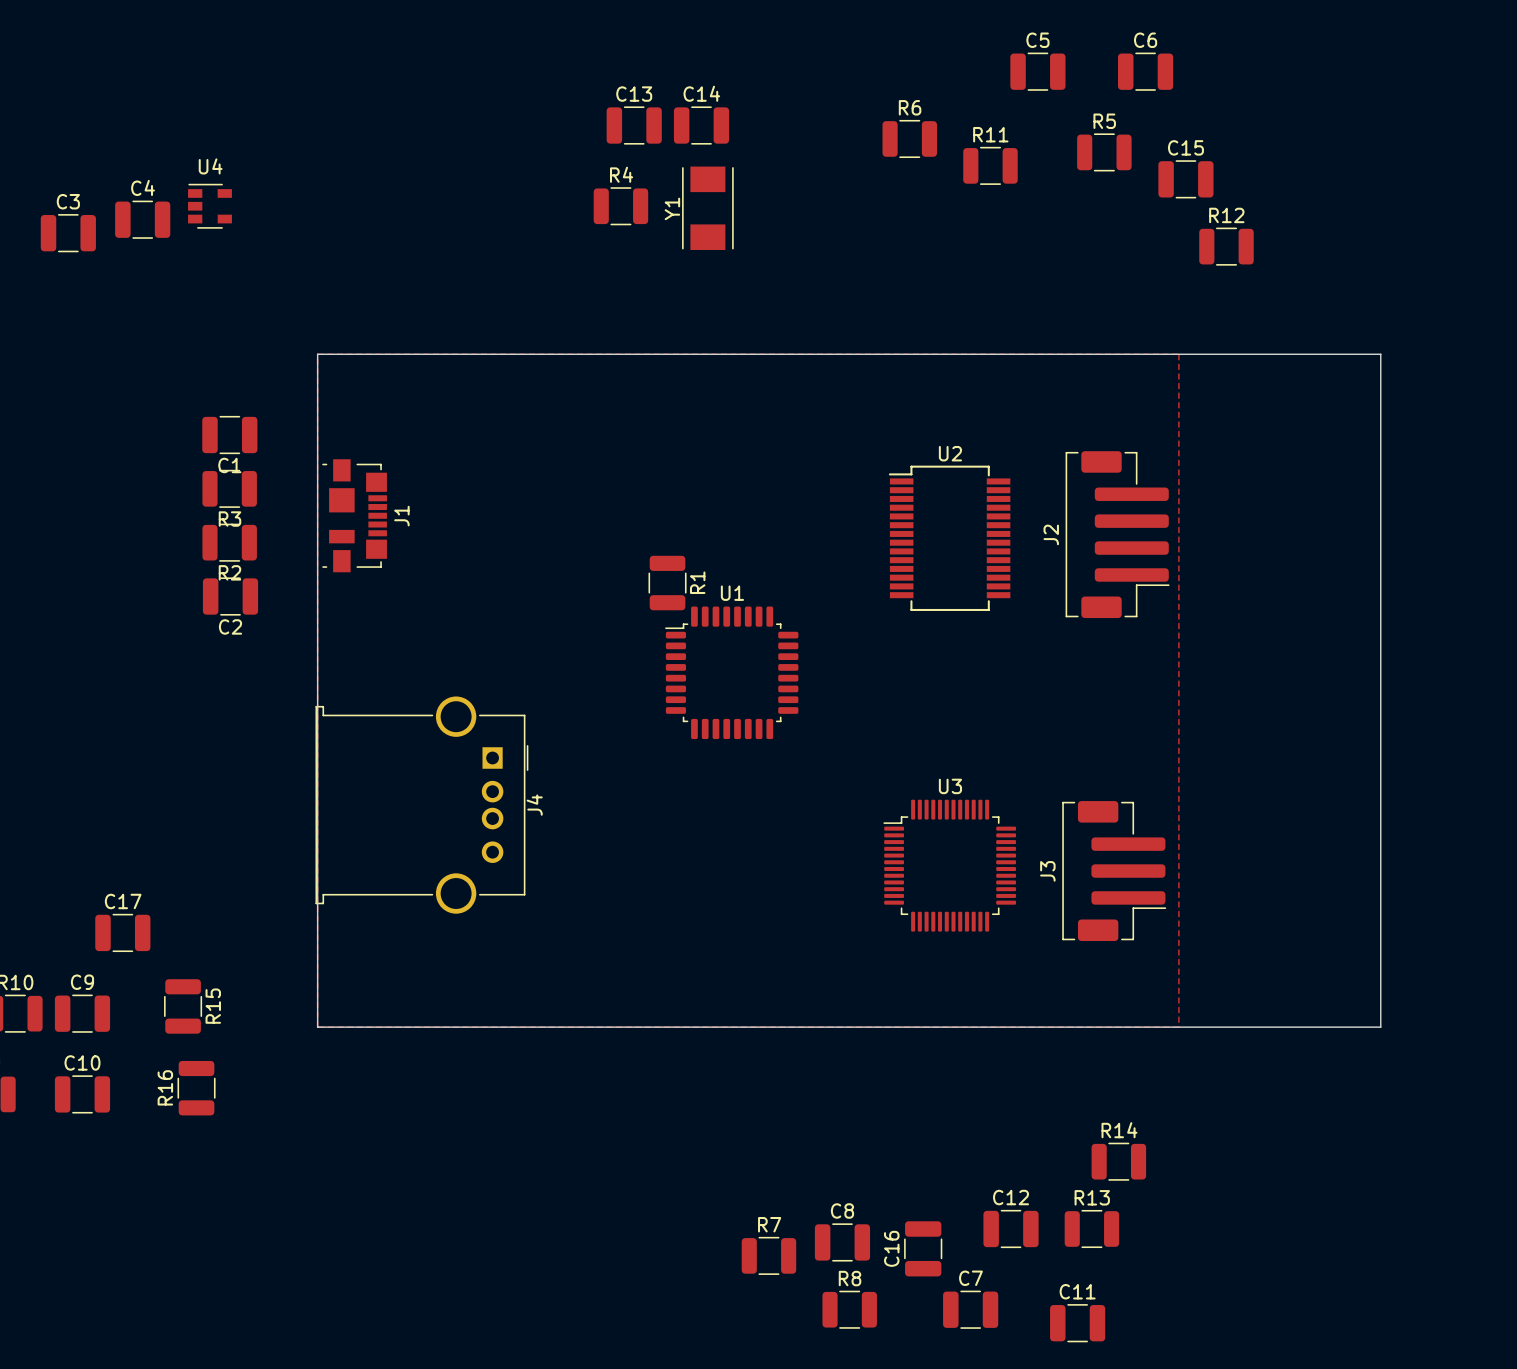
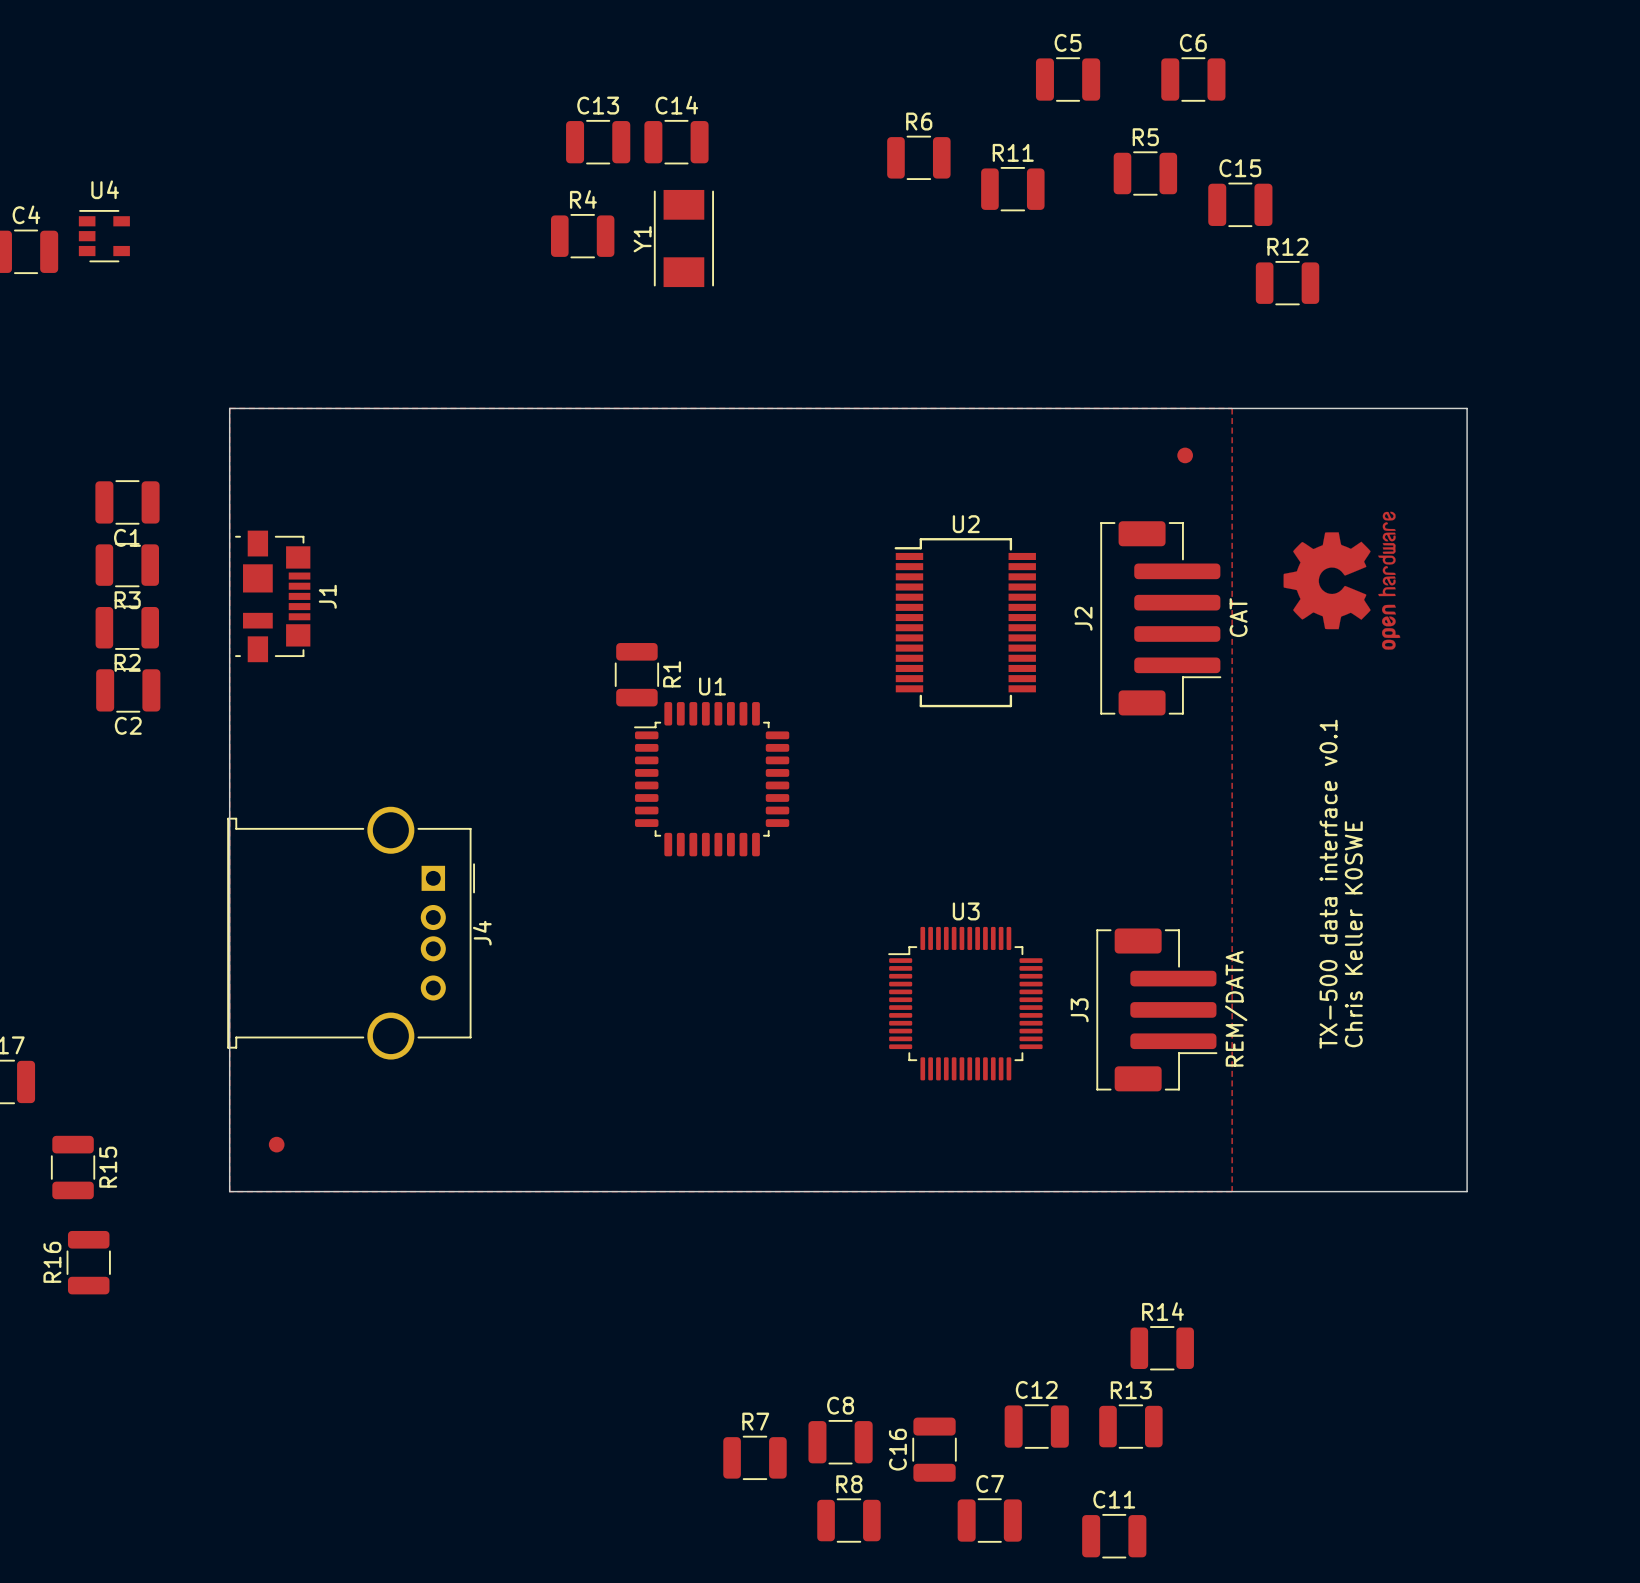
part: none -> (1185, 455)
drawing: none -> [1283, 511, 1401, 650]
J2 value: none -> CAT (1238, 617)
text: none -> TX-500 data interface v0.1 (1328, 884)
text: none -> Chris Keller K0SWE (1353, 934)
J3 value: none -> REM/DATA (1236, 1008)
part: none -> (276, 1144)

